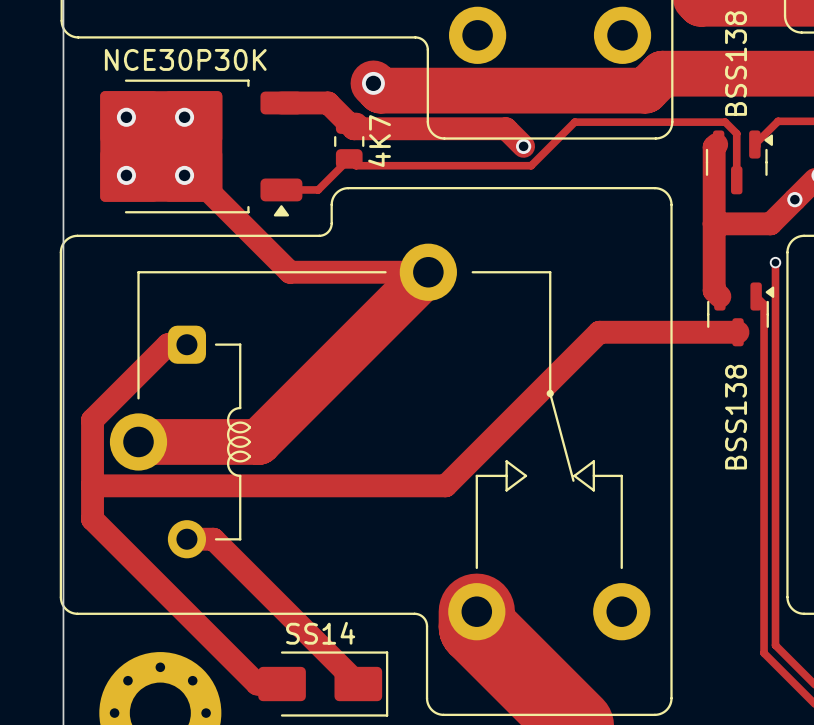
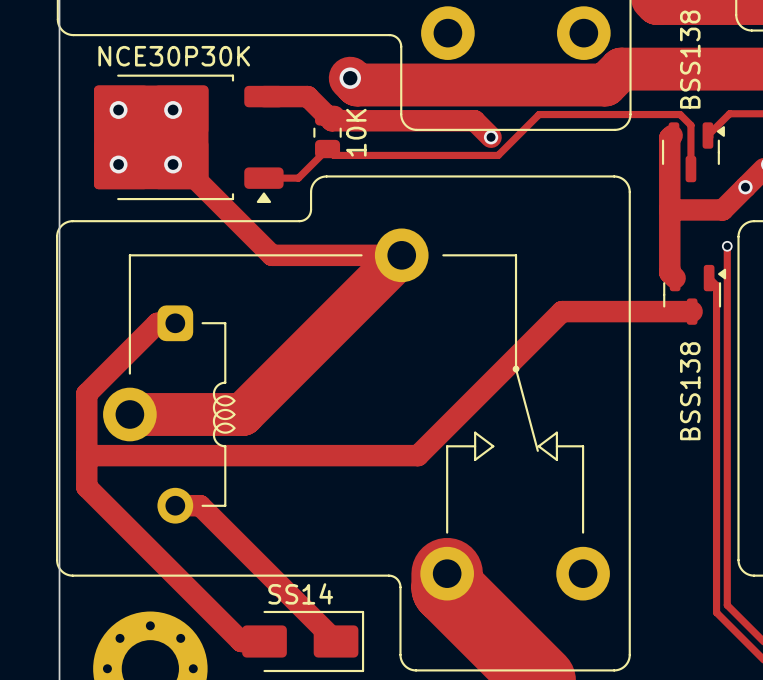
part value: 4K7 (379, 141) -> 10K (356, 132)

